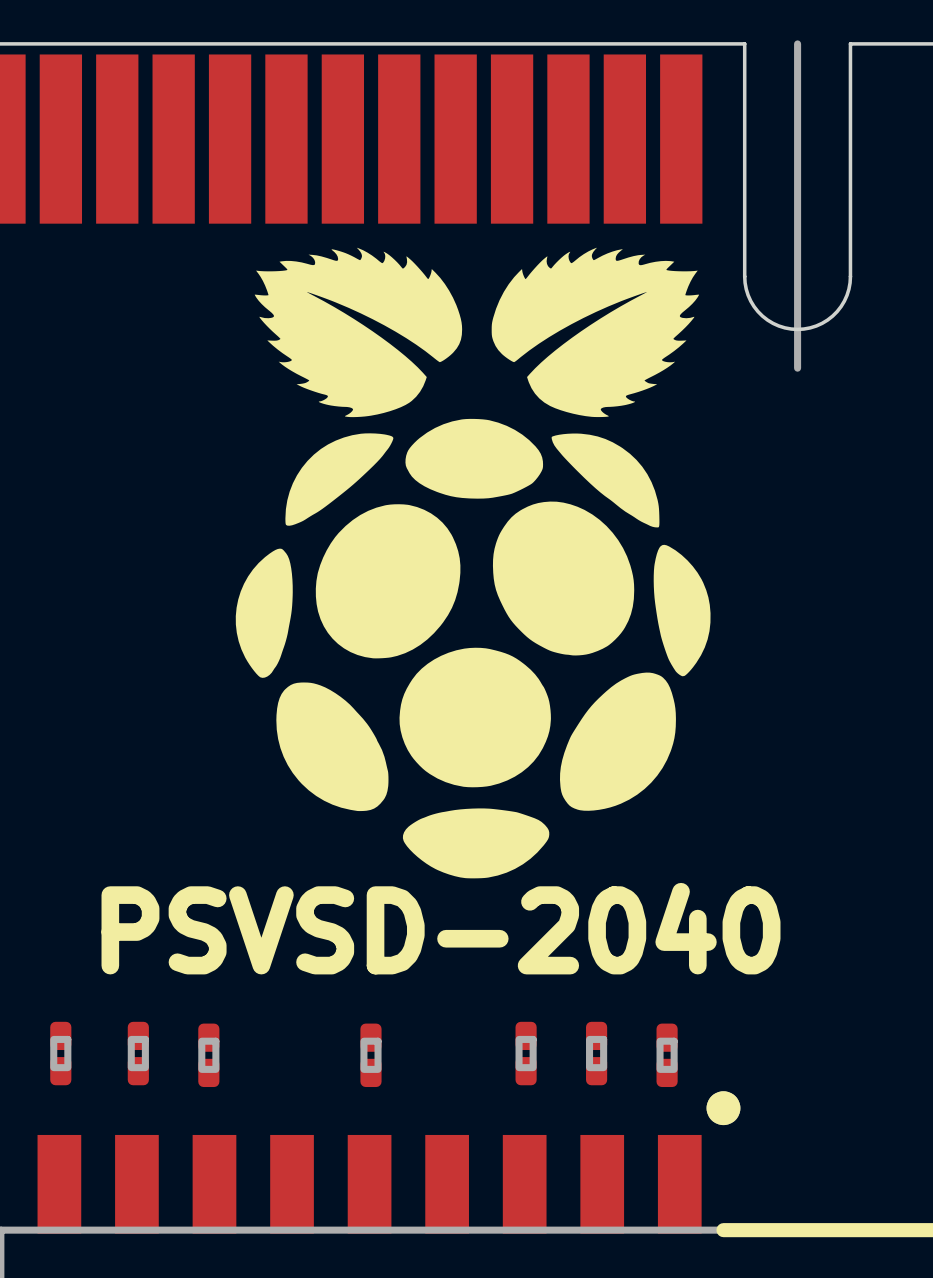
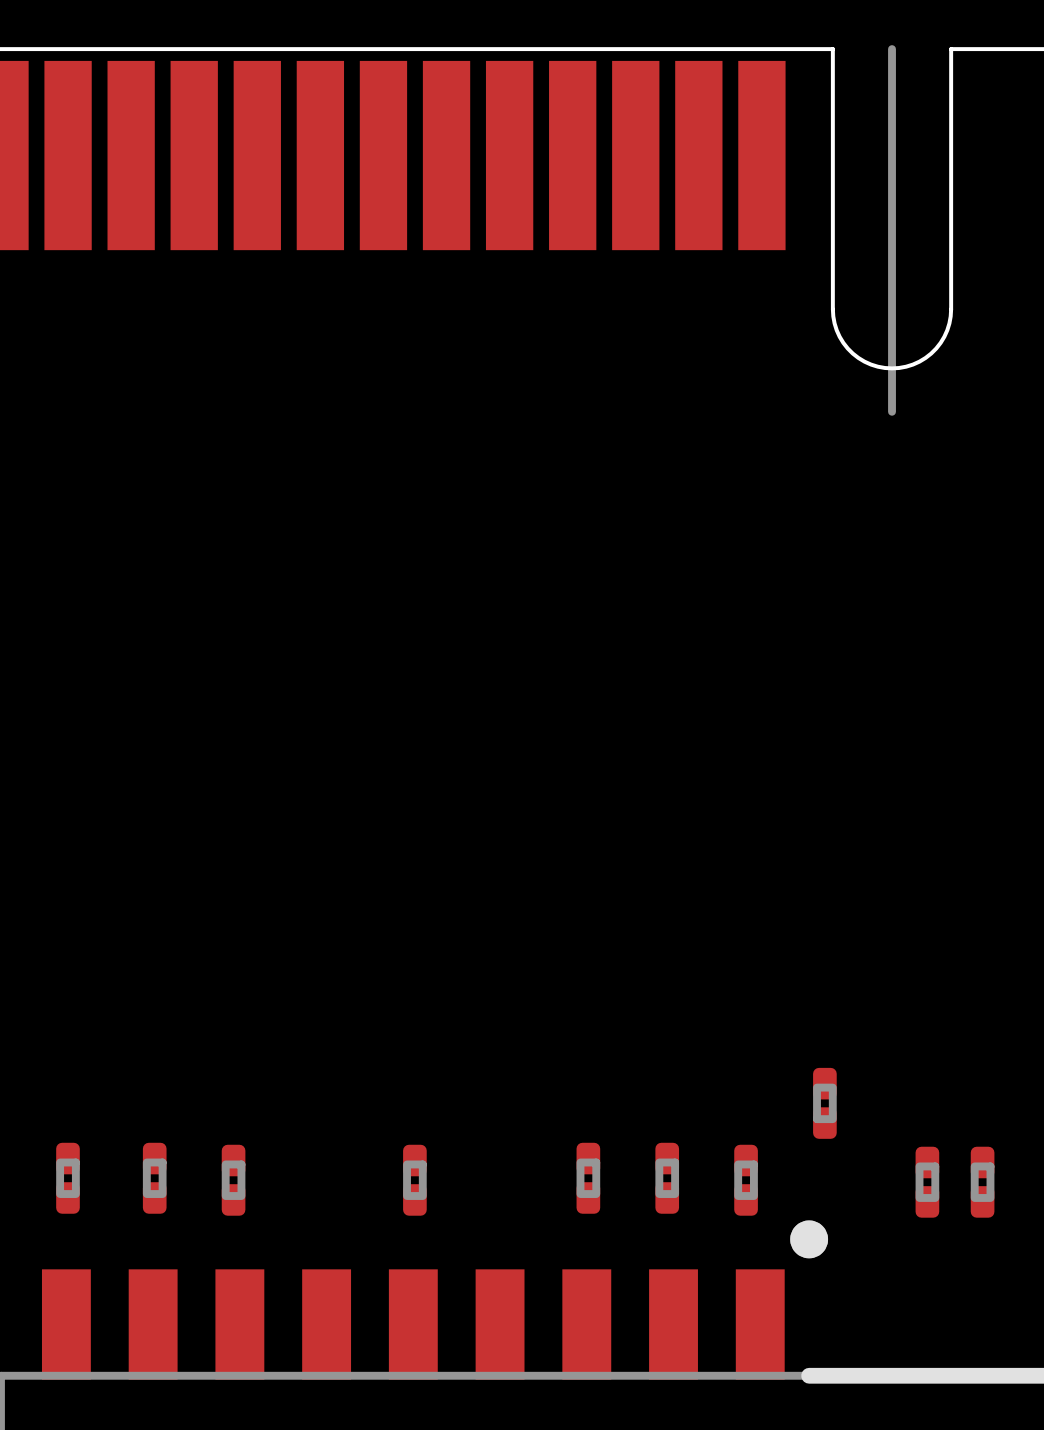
drawing: [235, 247, 711, 879] -> none
text: PSVSD-2040 (440, 928) -> none
part: none -> (824, 1103)
part: none -> (927, 1182)
part: none -> (982, 1182)

